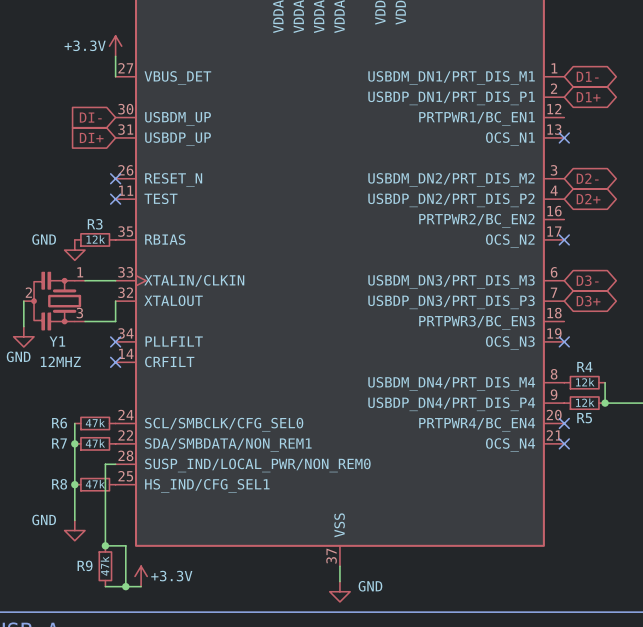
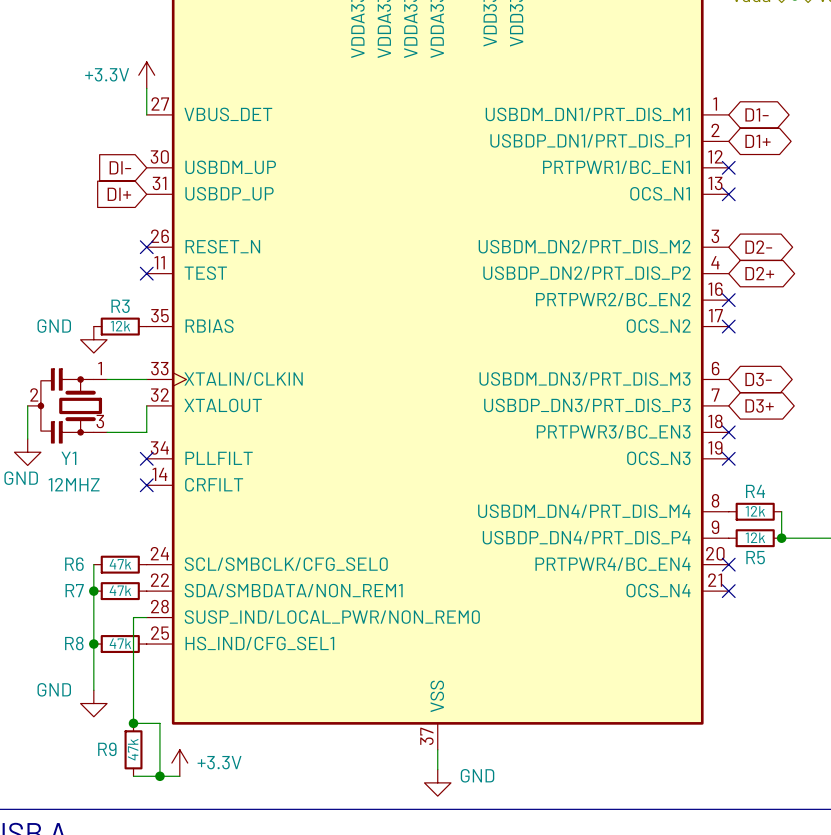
no-connect mark: none -> (728, 167)
no-connect mark: none -> (728, 300)
no-connect mark: none -> (728, 432)

